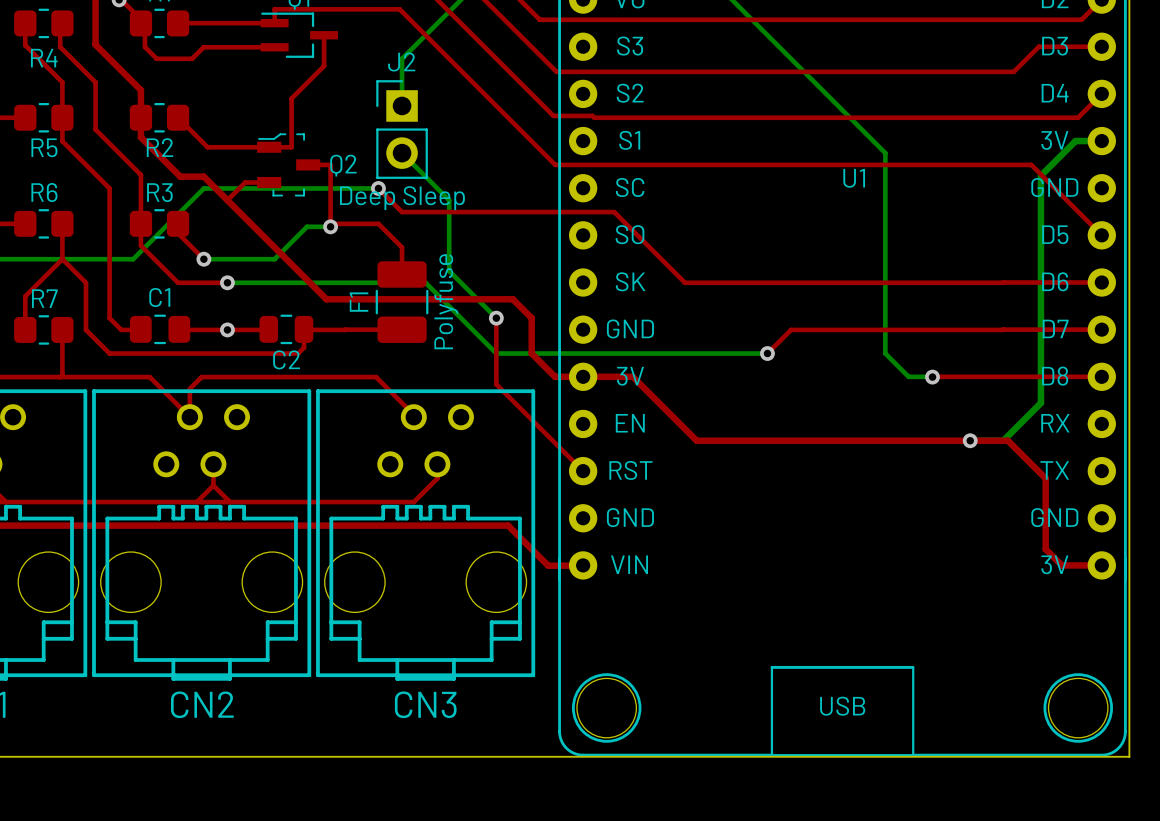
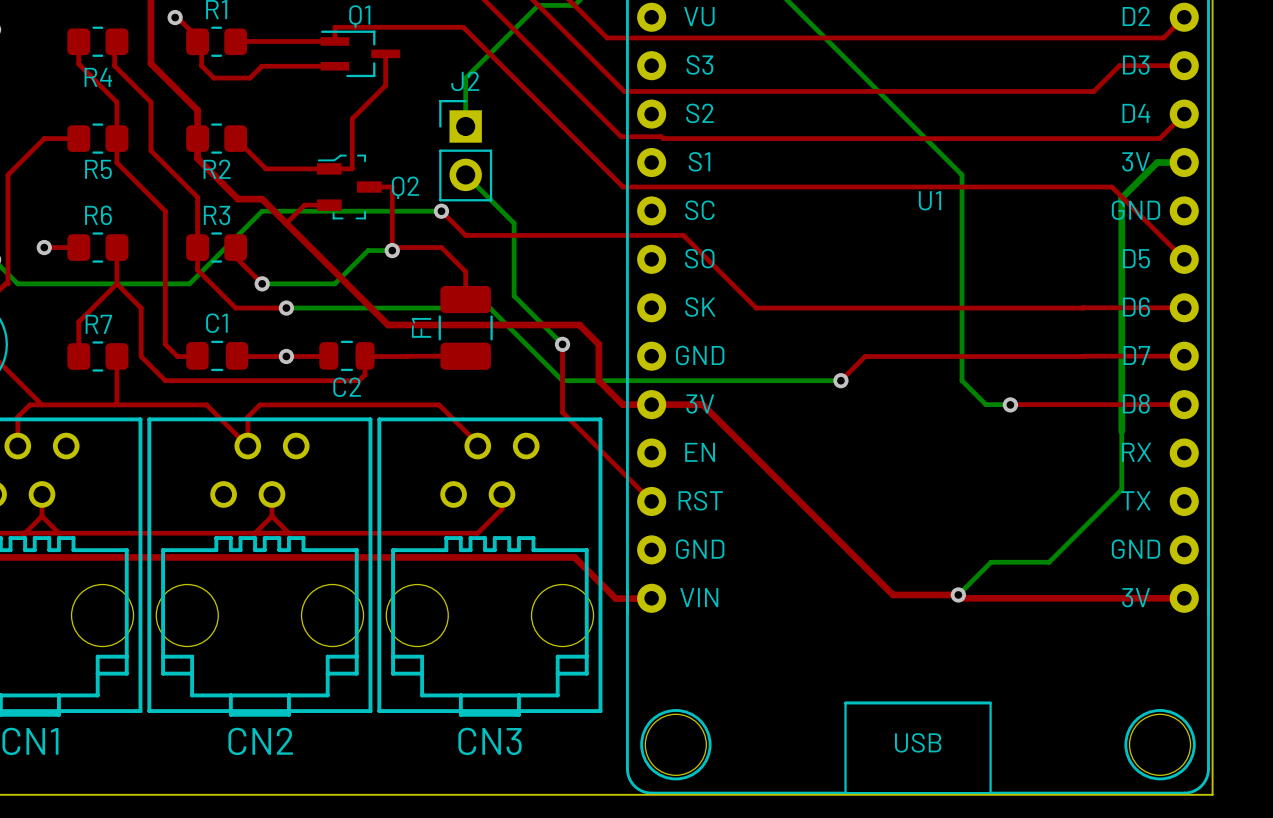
J2 value: Deep Sleep (402, 198) -> none
F1 value: Polyfuse (446, 301) -> none
bottom track: (1040, 403) (1003, 440) (970, 440) -> (1121, 431) (1121, 489) (1049, 562) (991, 562) (958, 594)
top track: (696, 440) (1007, 440) (1045, 478) (1045, 549) (1061, 565) -> (768, 470) (893, 594) (958, 594) (962, 598)
via: (970, 440) -> none
via: none -> (958, 594)
top track: none -> (961, 598) (1143, 598)

